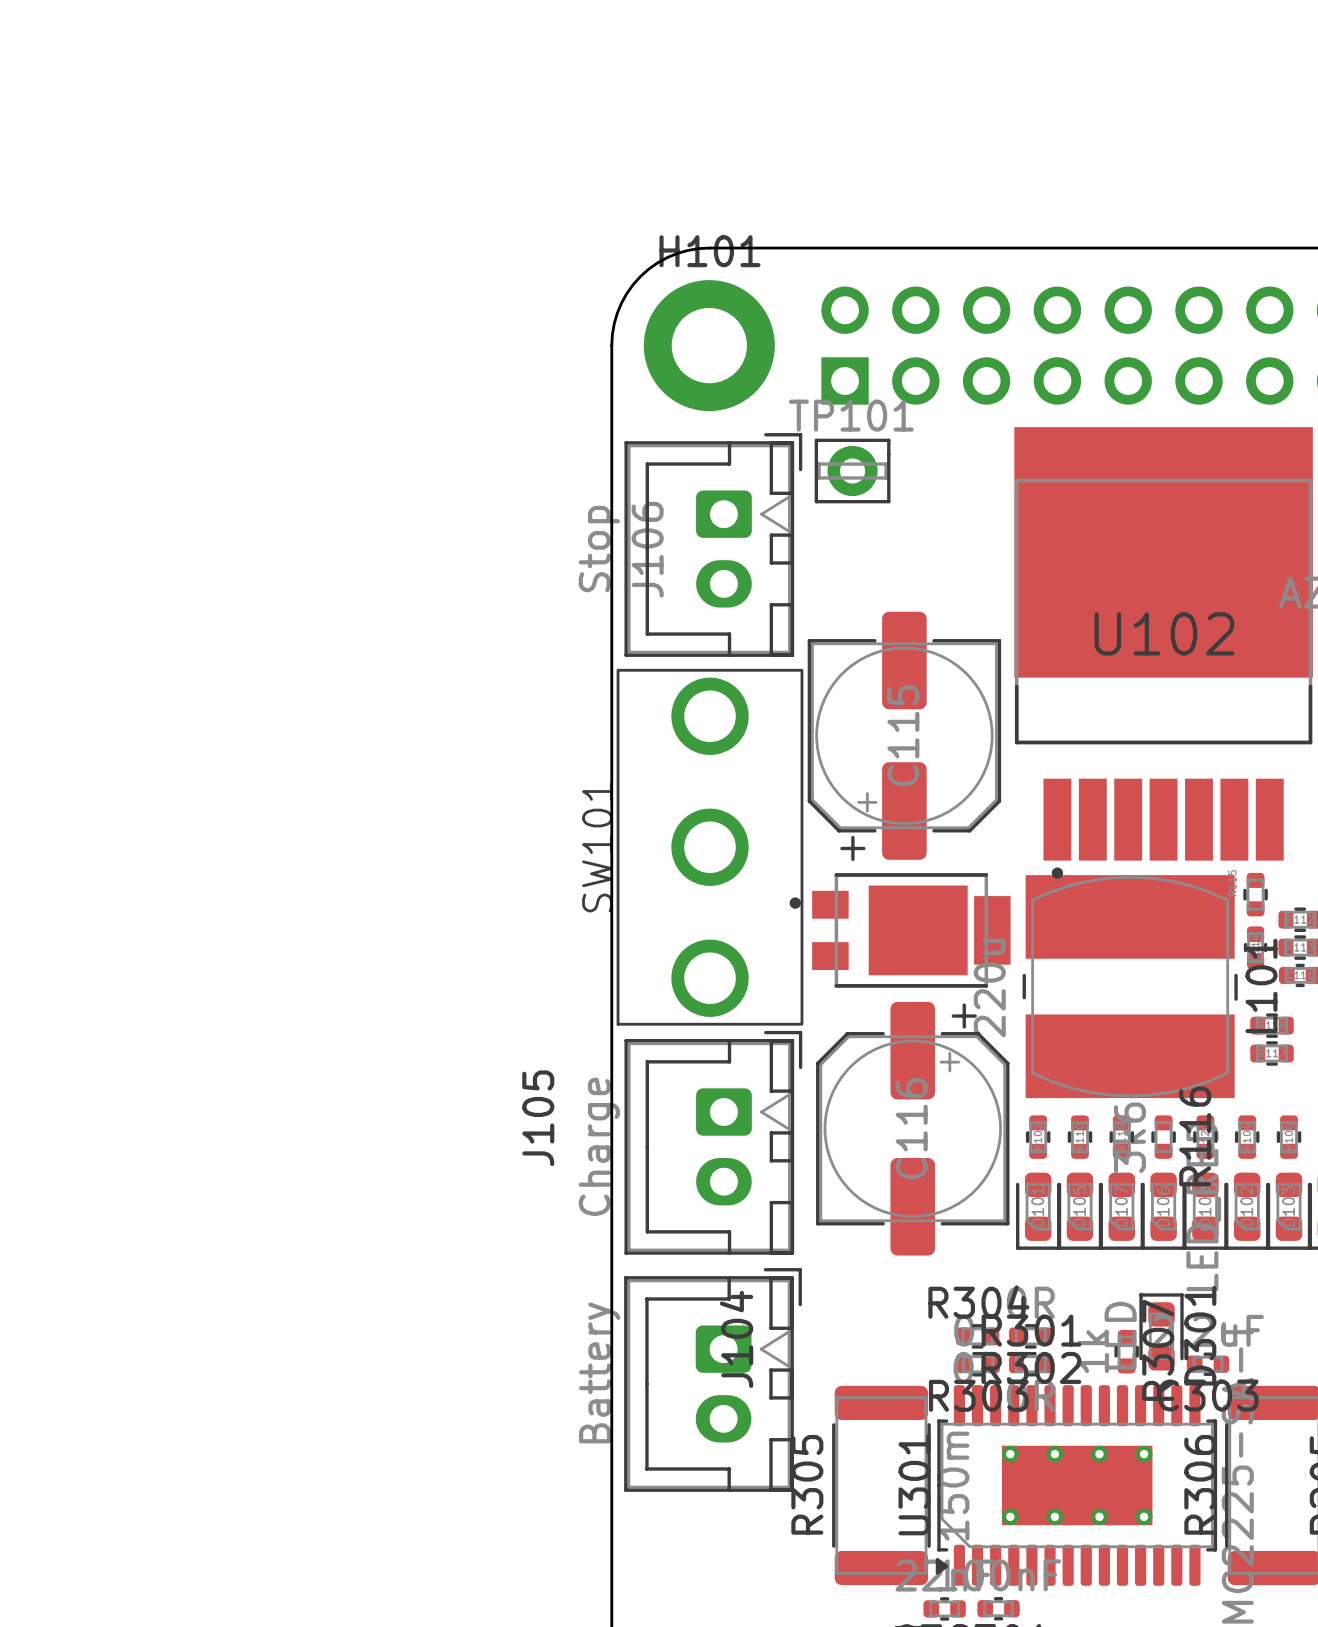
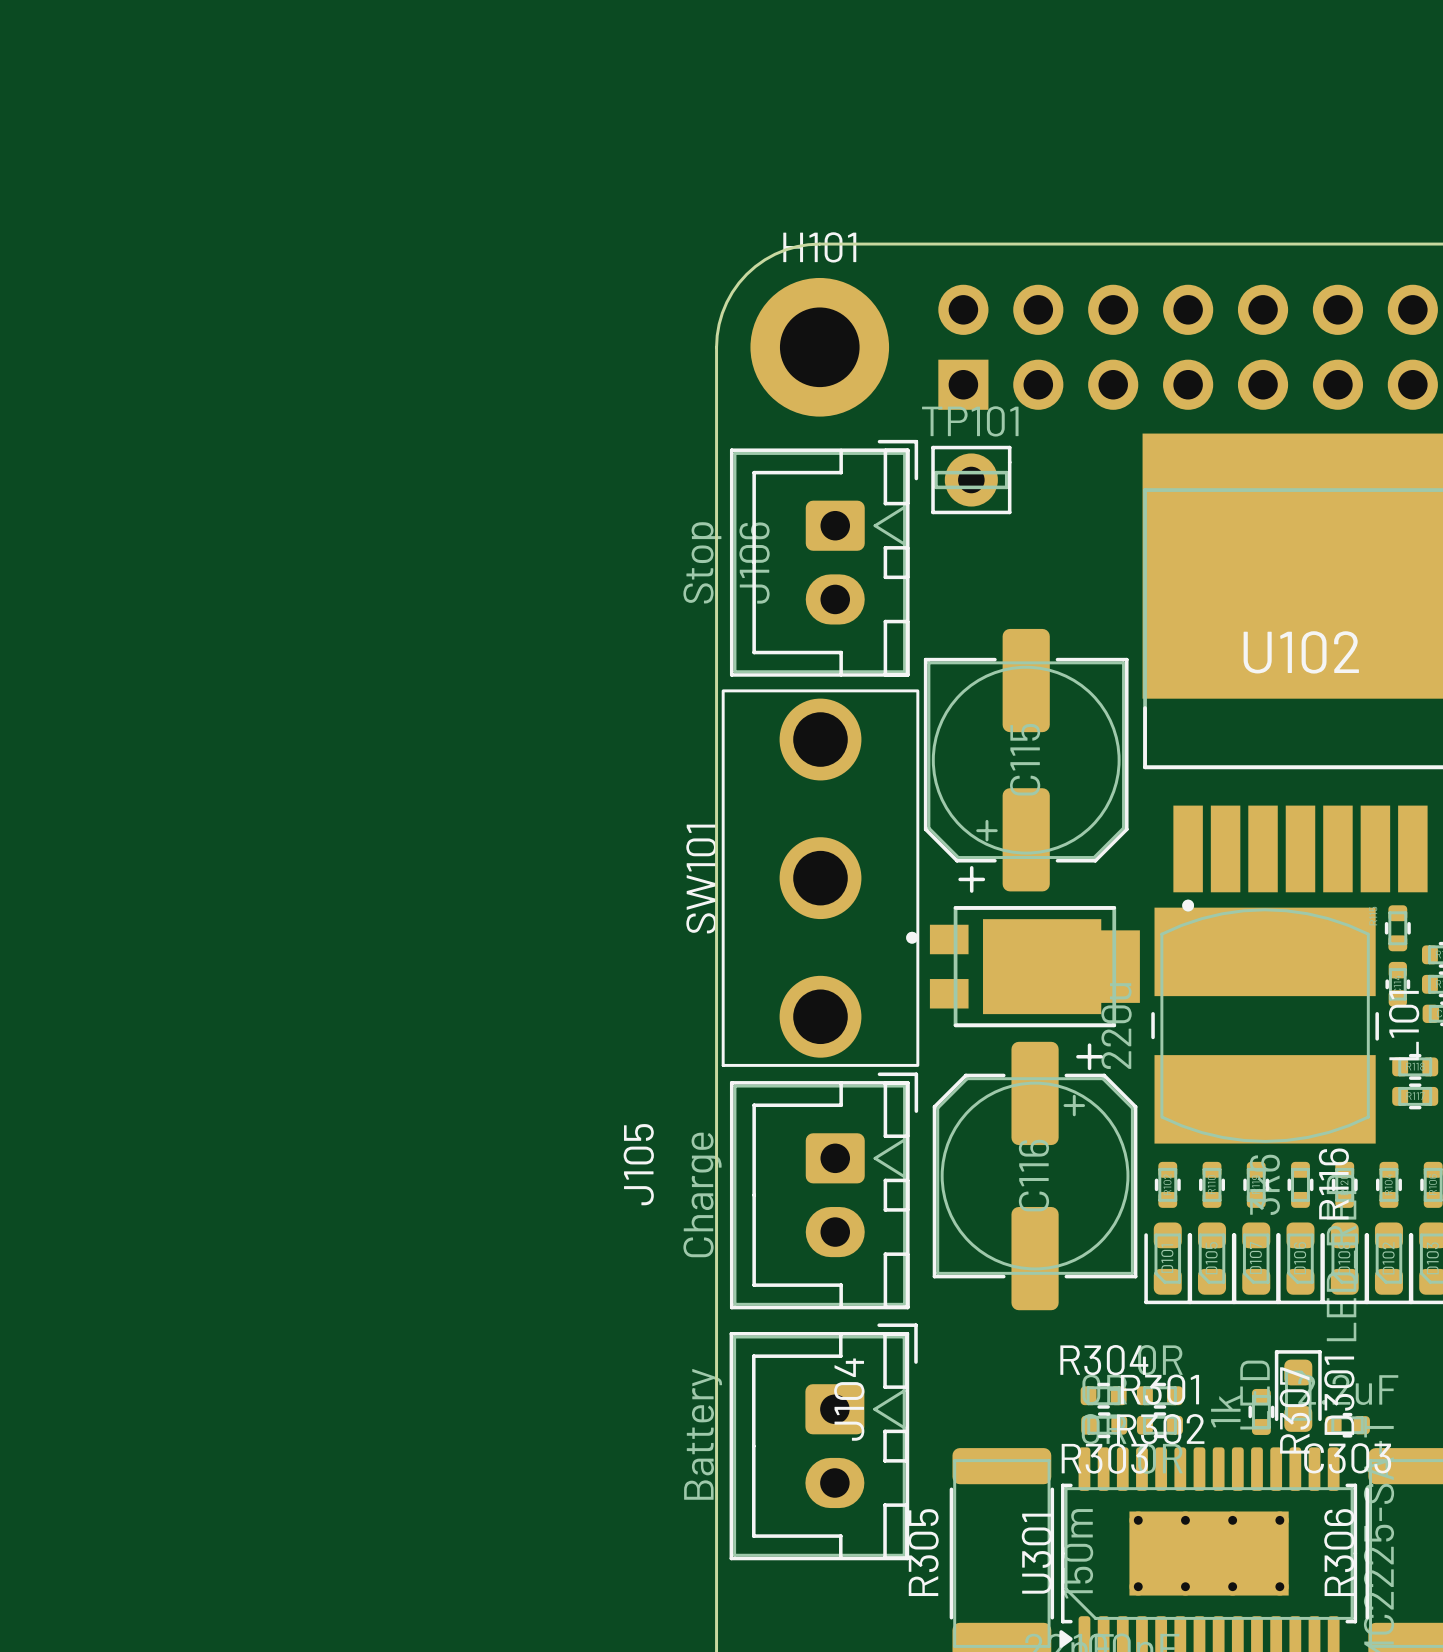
part footprint: [789, 873, 1011, 988] -> [906, 906, 1140, 1028]

